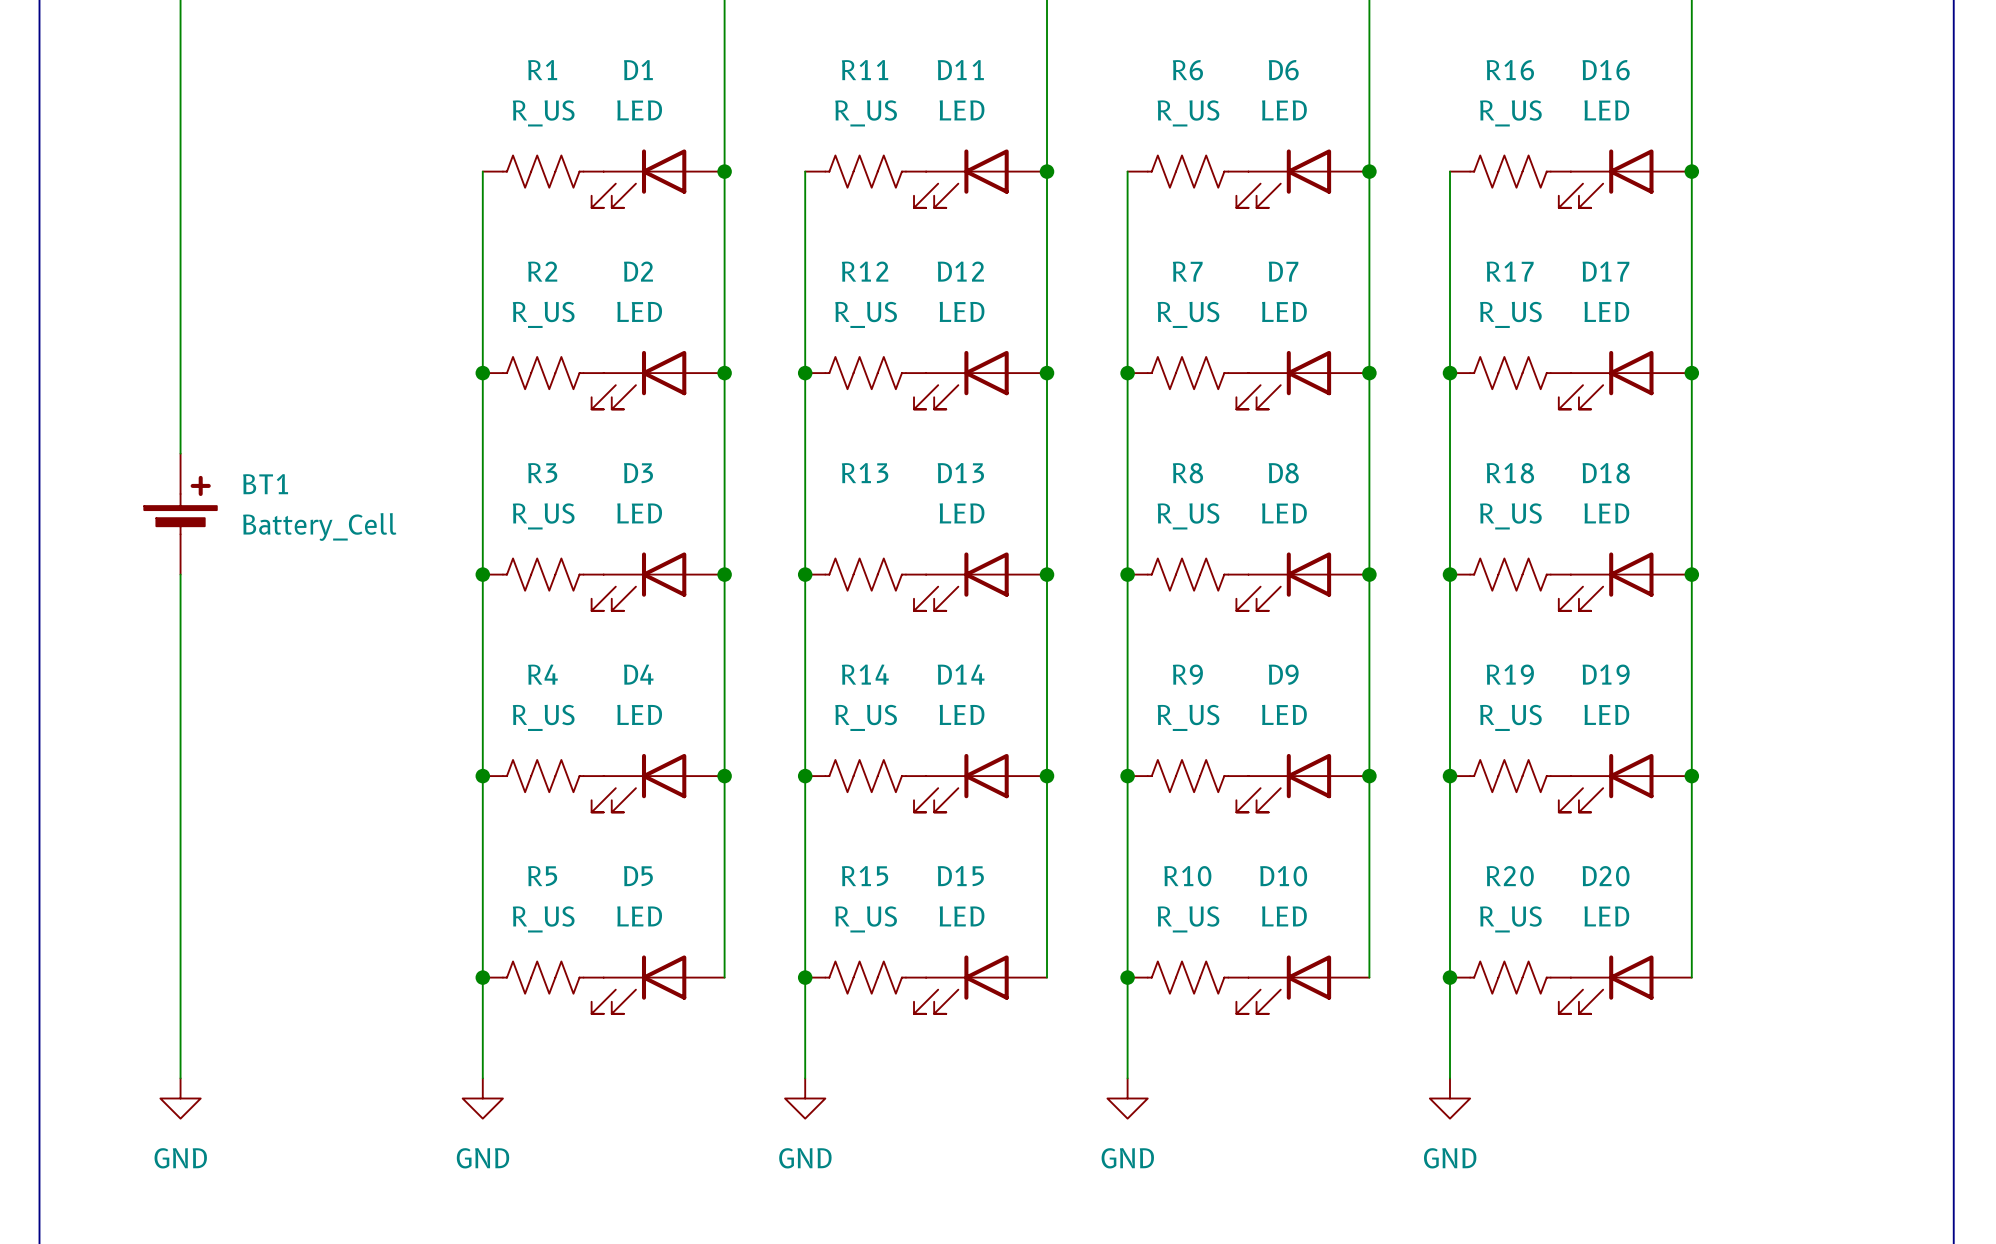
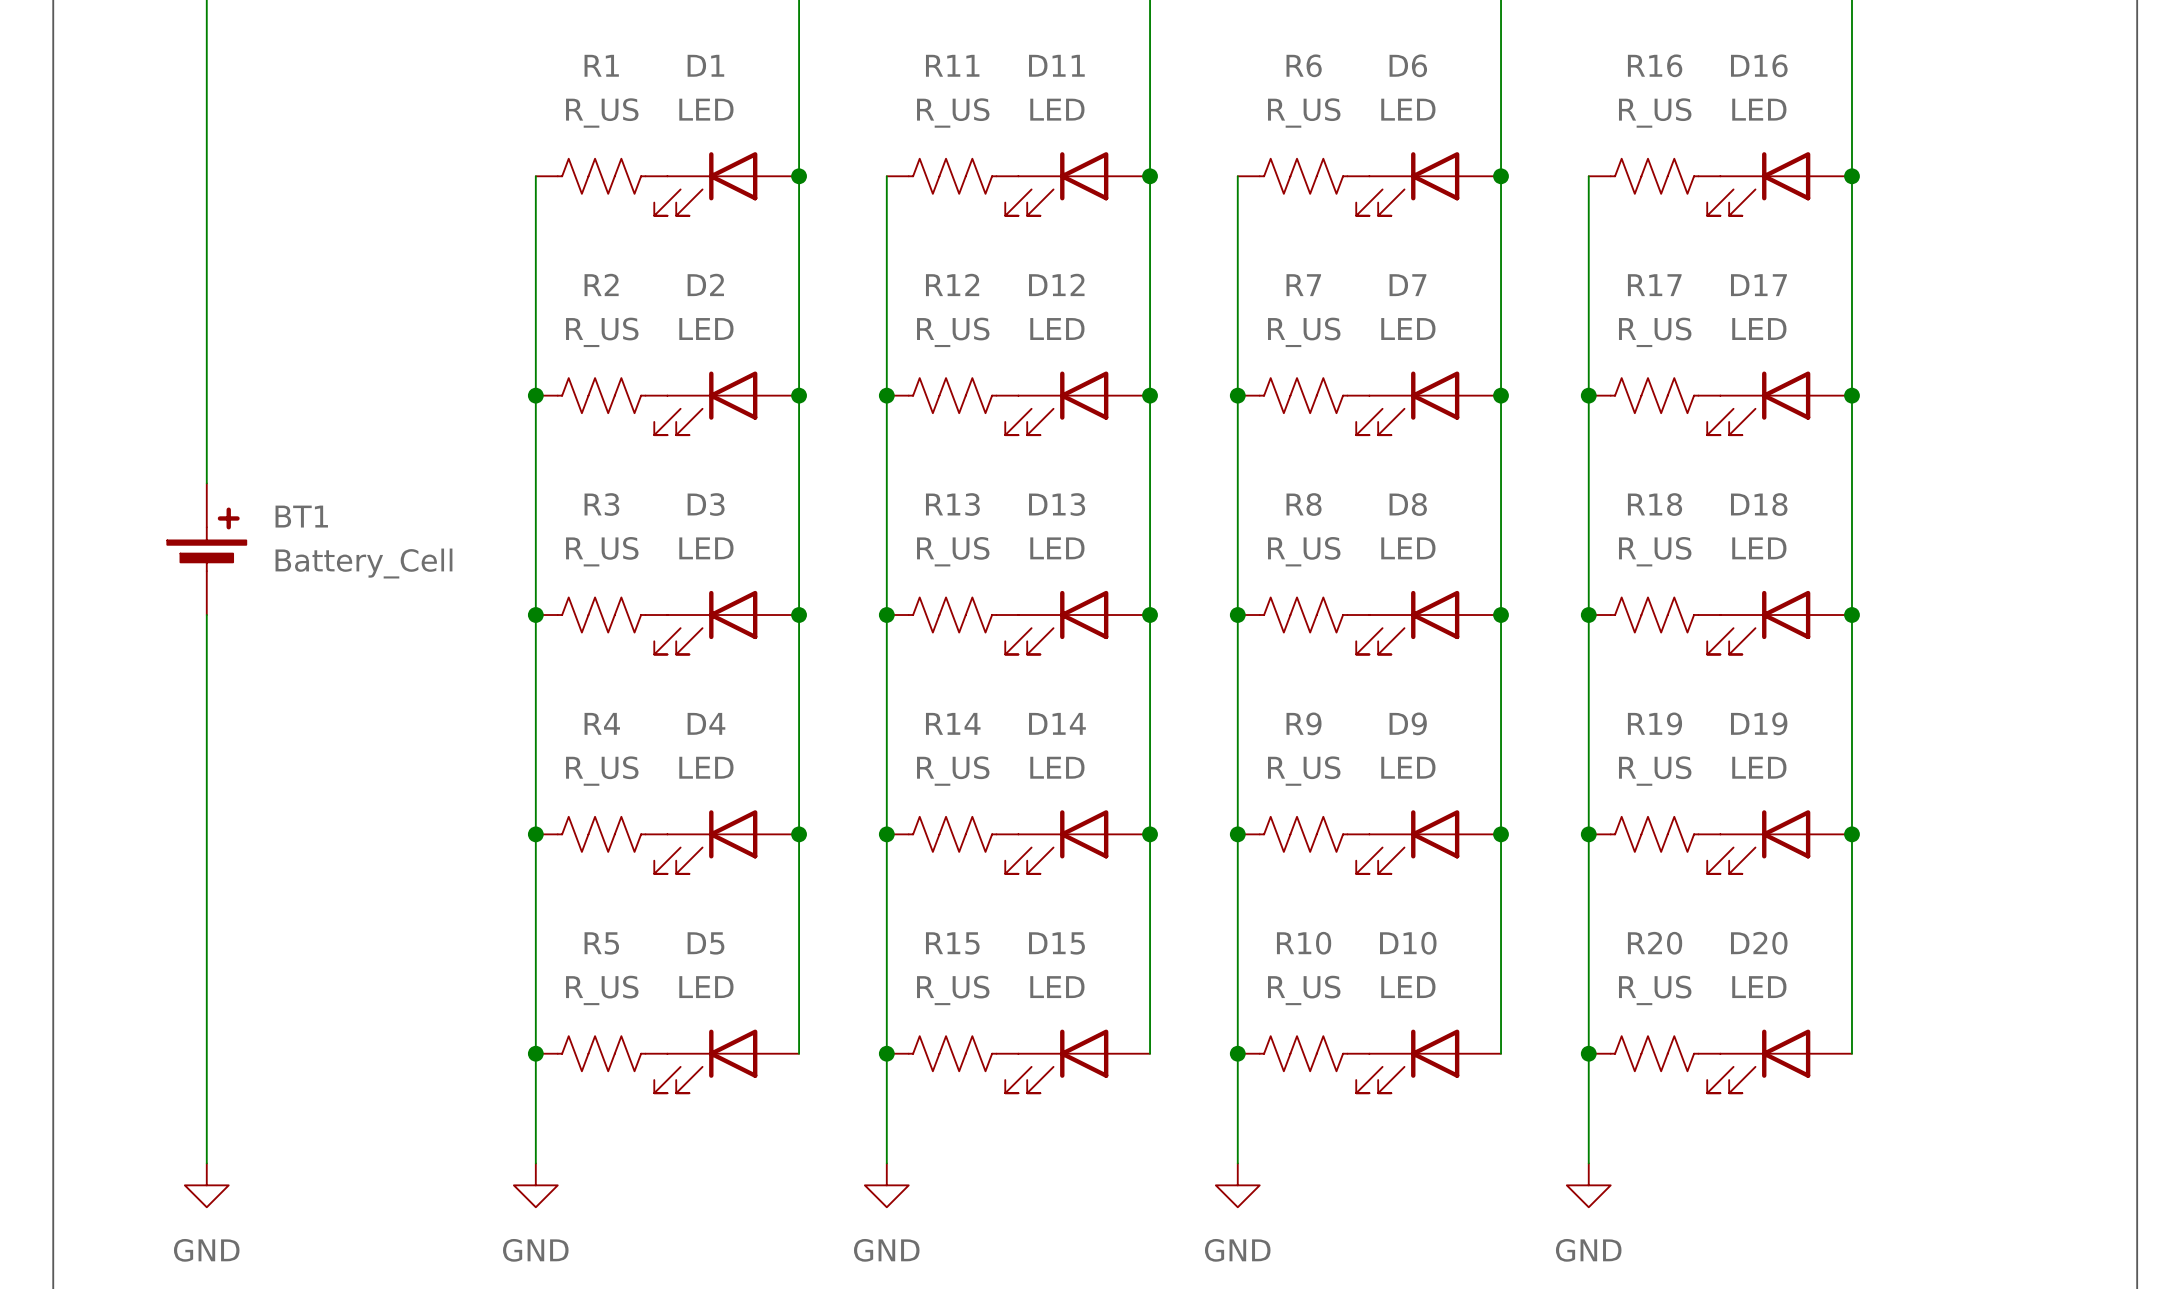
R13 value: none -> R_US (953, 551)

